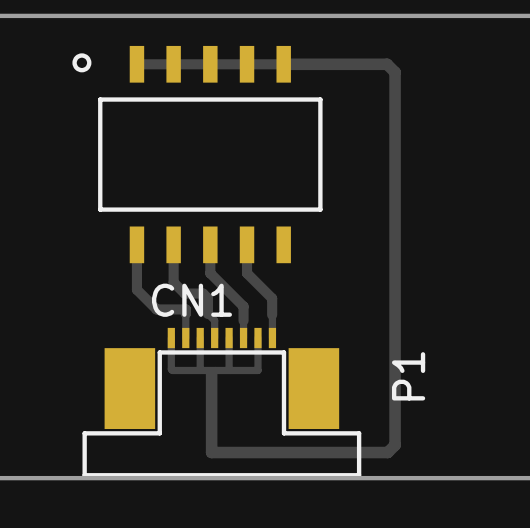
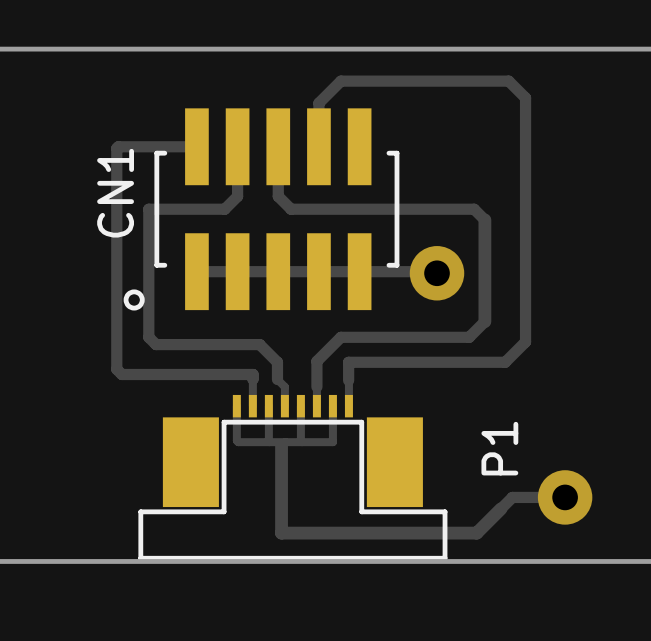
CN1 footprint: [72, 45, 323, 264] -> [123, 108, 400, 311]
track: (136, 64) (387, 64) (395, 72) (395, 170) -> (278, 146) (278, 196) (291, 209) (474, 209) (484, 219)
track: none -> (196, 271) (435, 271) (437, 273)
via: none -> (437, 273)
track: (136, 244) (136, 289) (156, 309) -> (196, 146) (118, 146) (116, 148) (116, 369) (121, 374) (220, 374)
track: (173, 244) (173, 282) (184, 293) (203, 293) -> (237, 146) (237, 196) (224, 209) (148, 209) (148, 337) (156, 344) (259, 344) (272, 356)
track: (210, 244) (210, 273) (243, 306) -> (484, 321) (469, 337) (340, 337) (316, 361) (316, 371)
track: (247, 244) (247, 273) (272, 298) -> (318, 146) (318, 103) (340, 81) (508, 81) (525, 97) (525, 341) (505, 362) (348, 362)
track: (395, 261) (395, 445) -> (565, 497) (512, 497) (484, 524)
CN1 name position: CN1 (191, 300) -> CN1 (115, 193)
via: none -> (565, 497)

